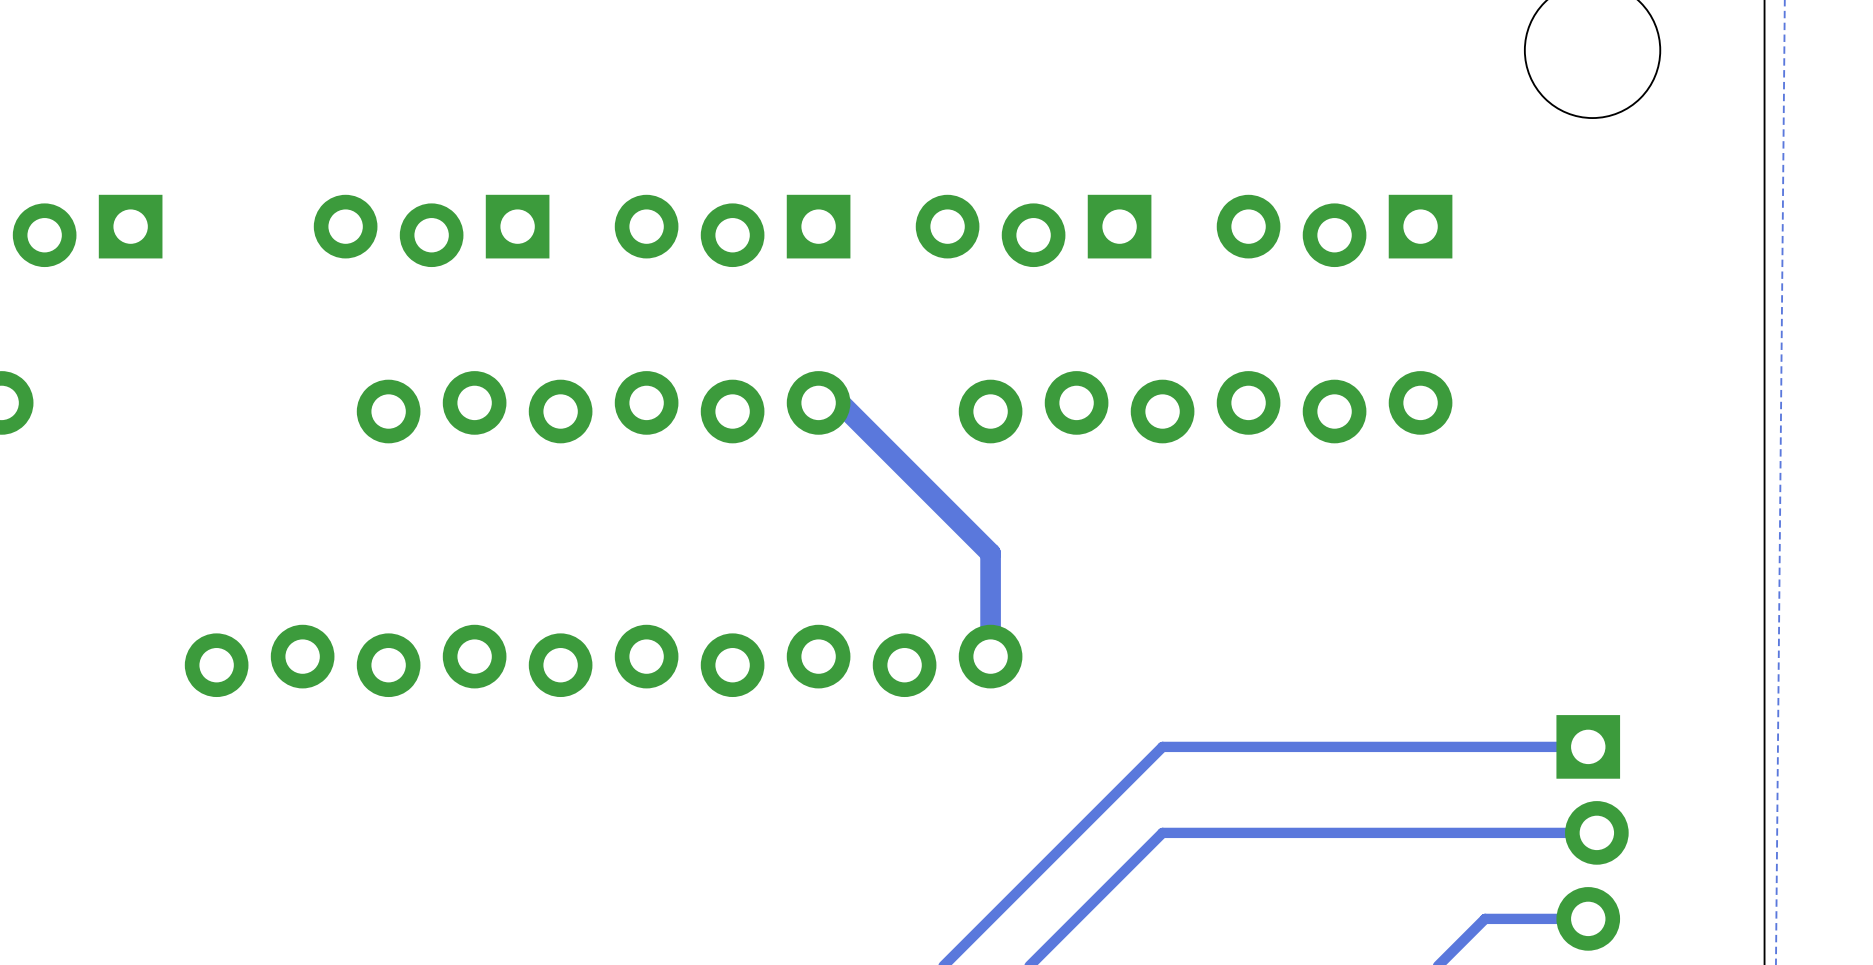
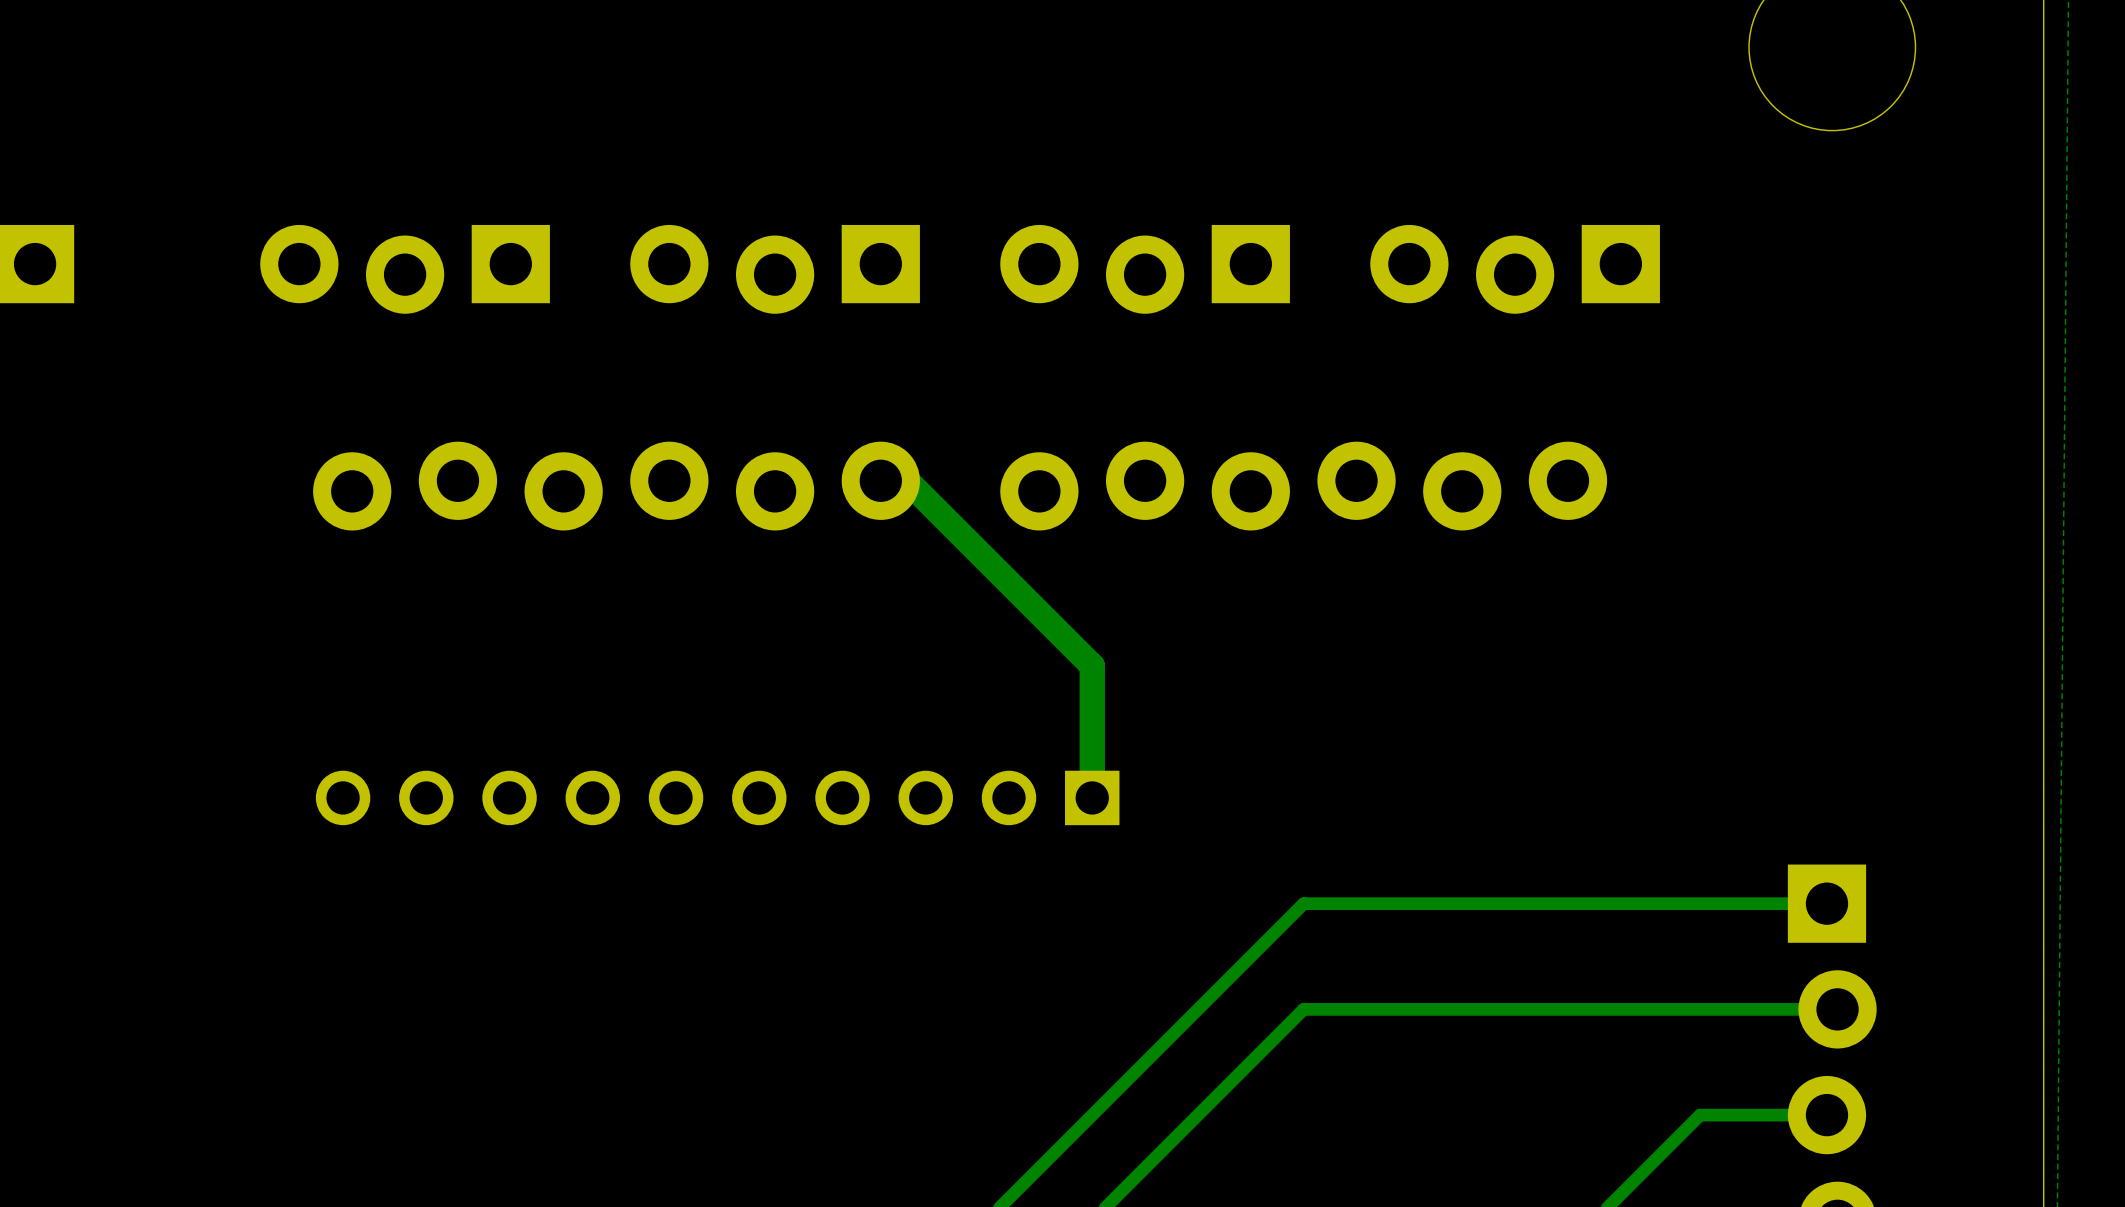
part position: (1205, 407) -> (1303, 486)
part: (603, 660) -> none
part: none -> (717, 797)

